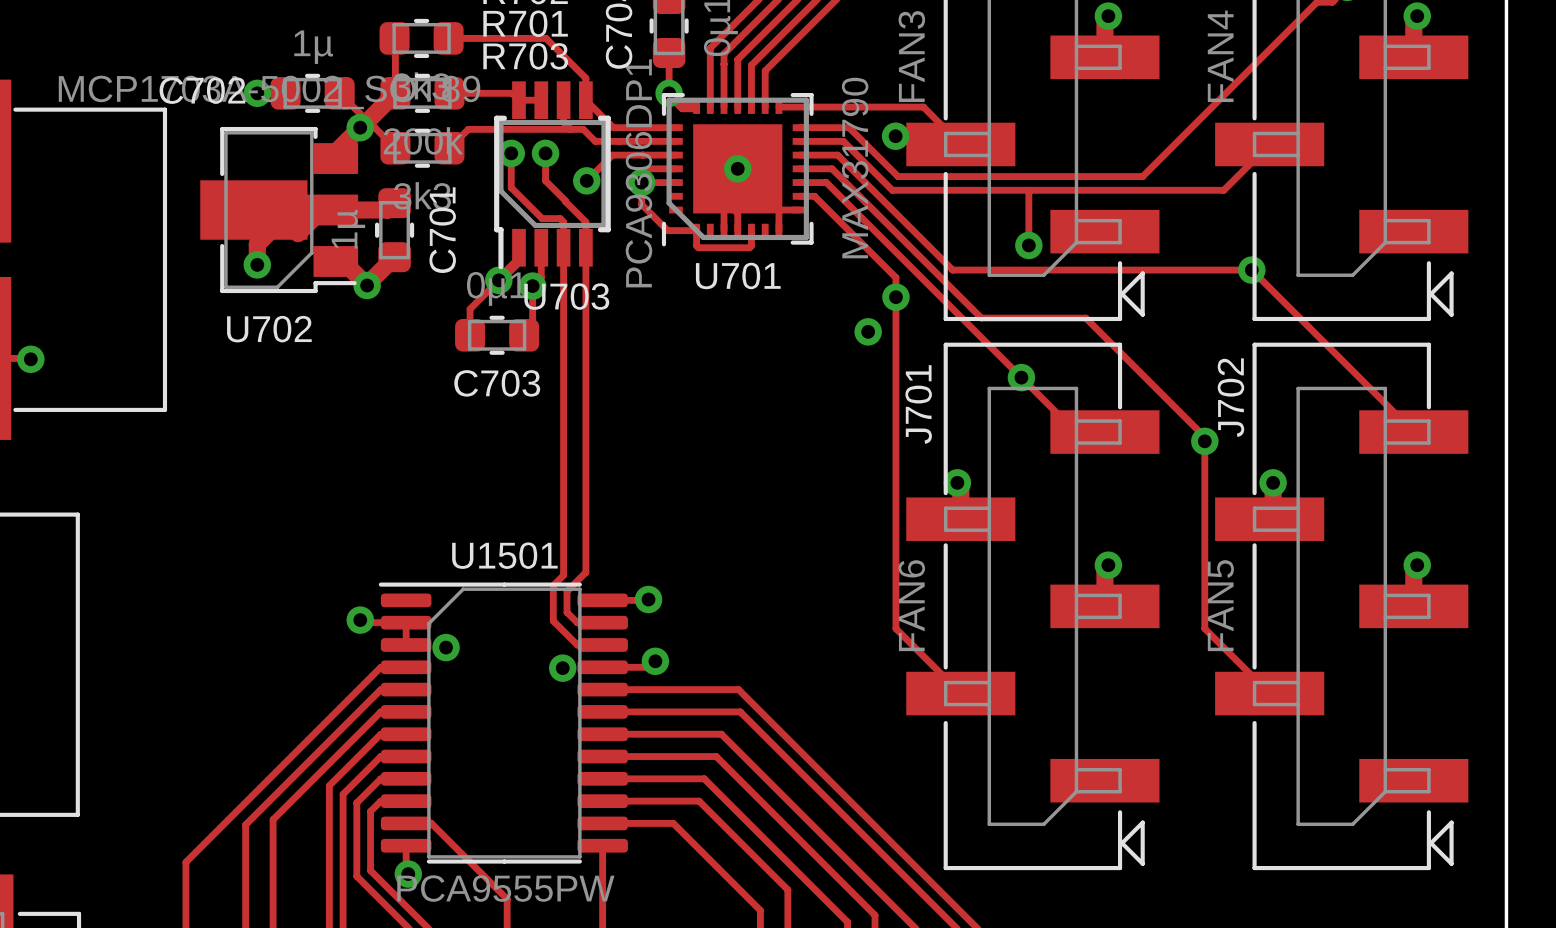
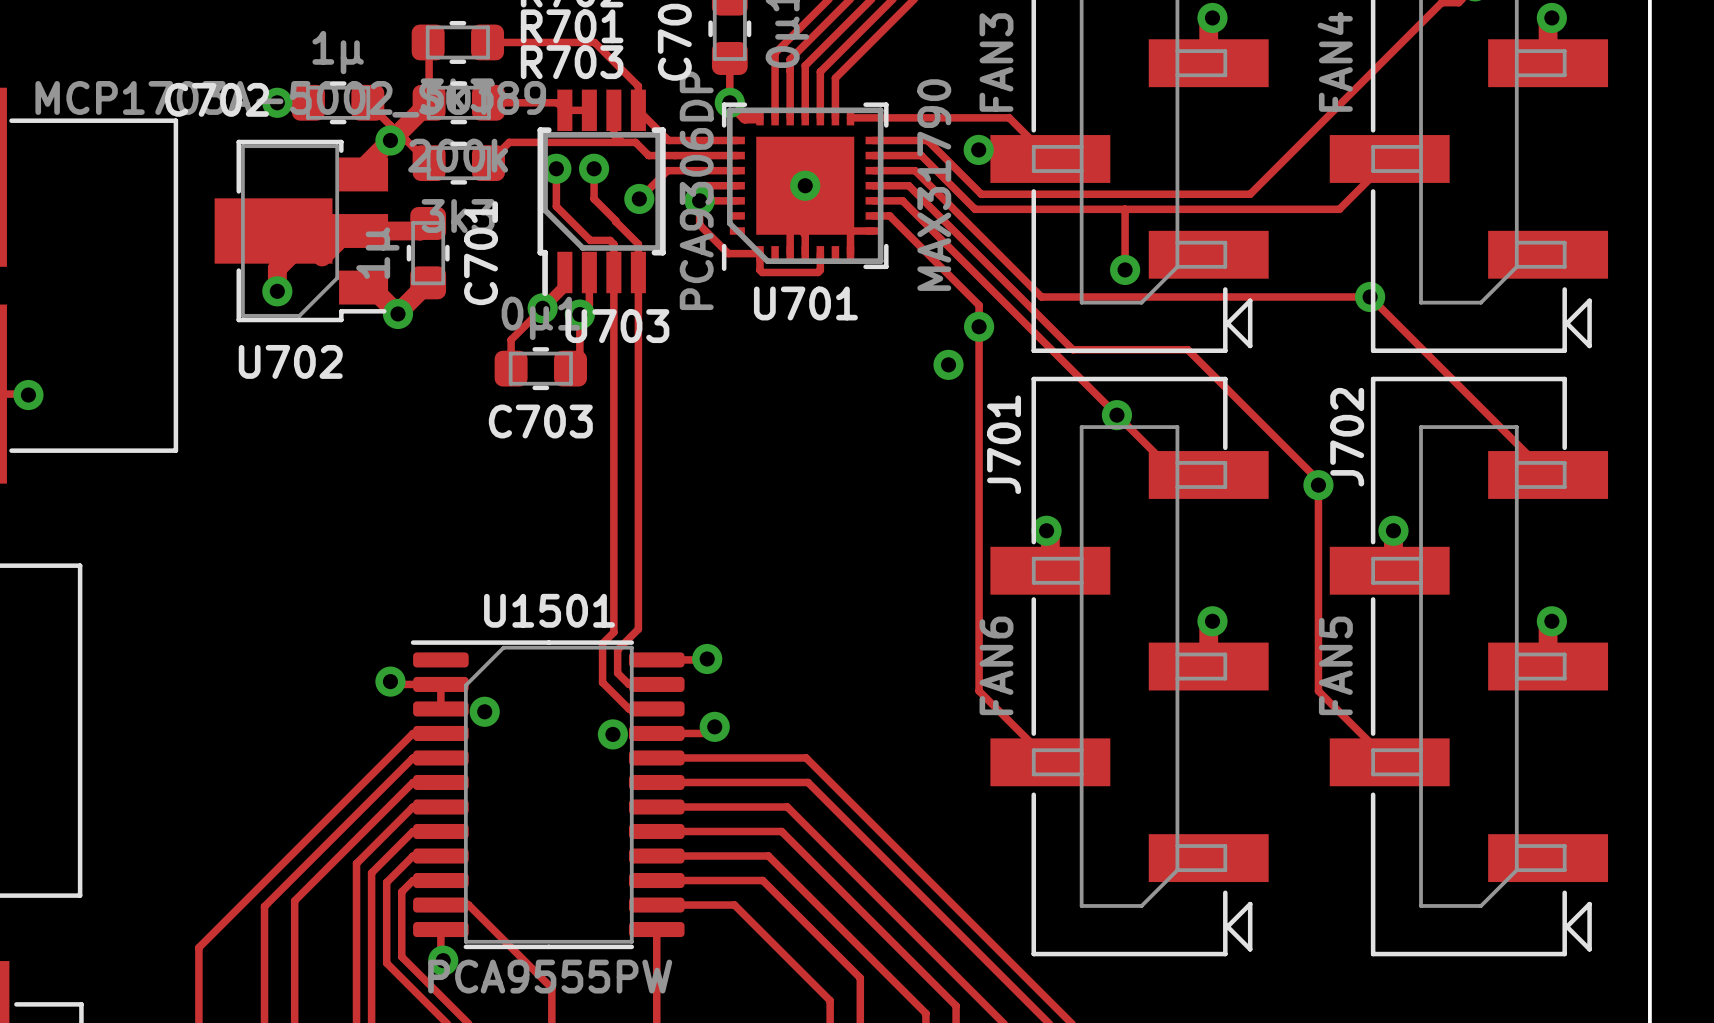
U703 value: PCA9306DP1 (638, 173) -> PCA9306DP (696, 190)

